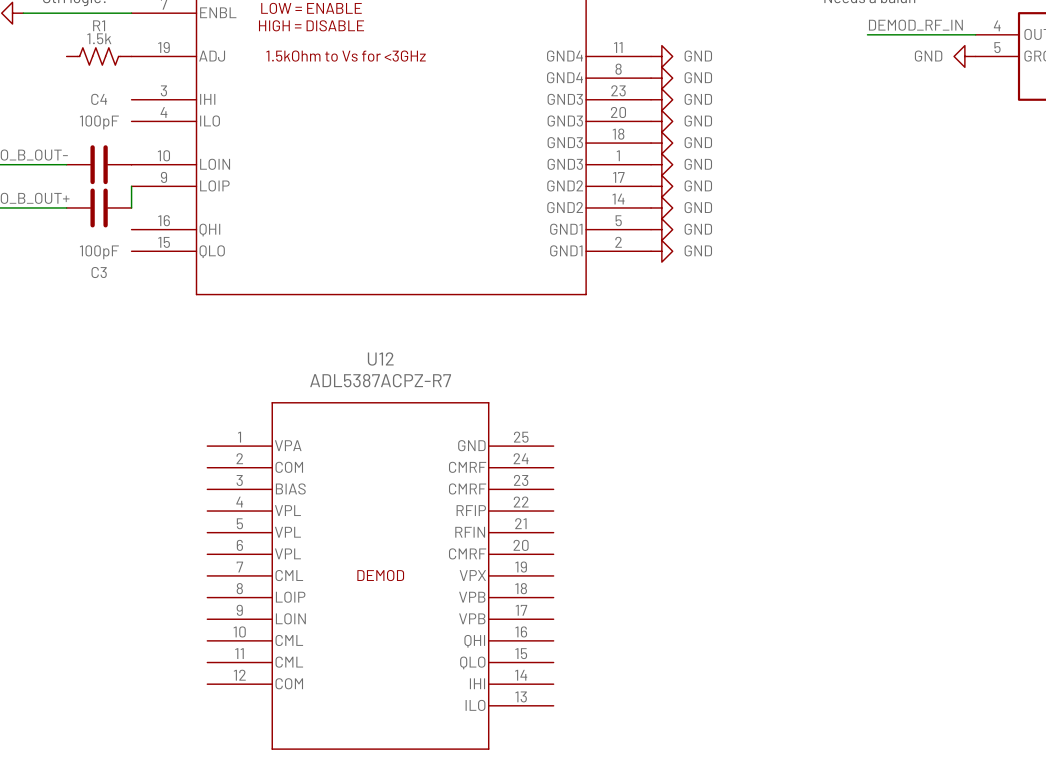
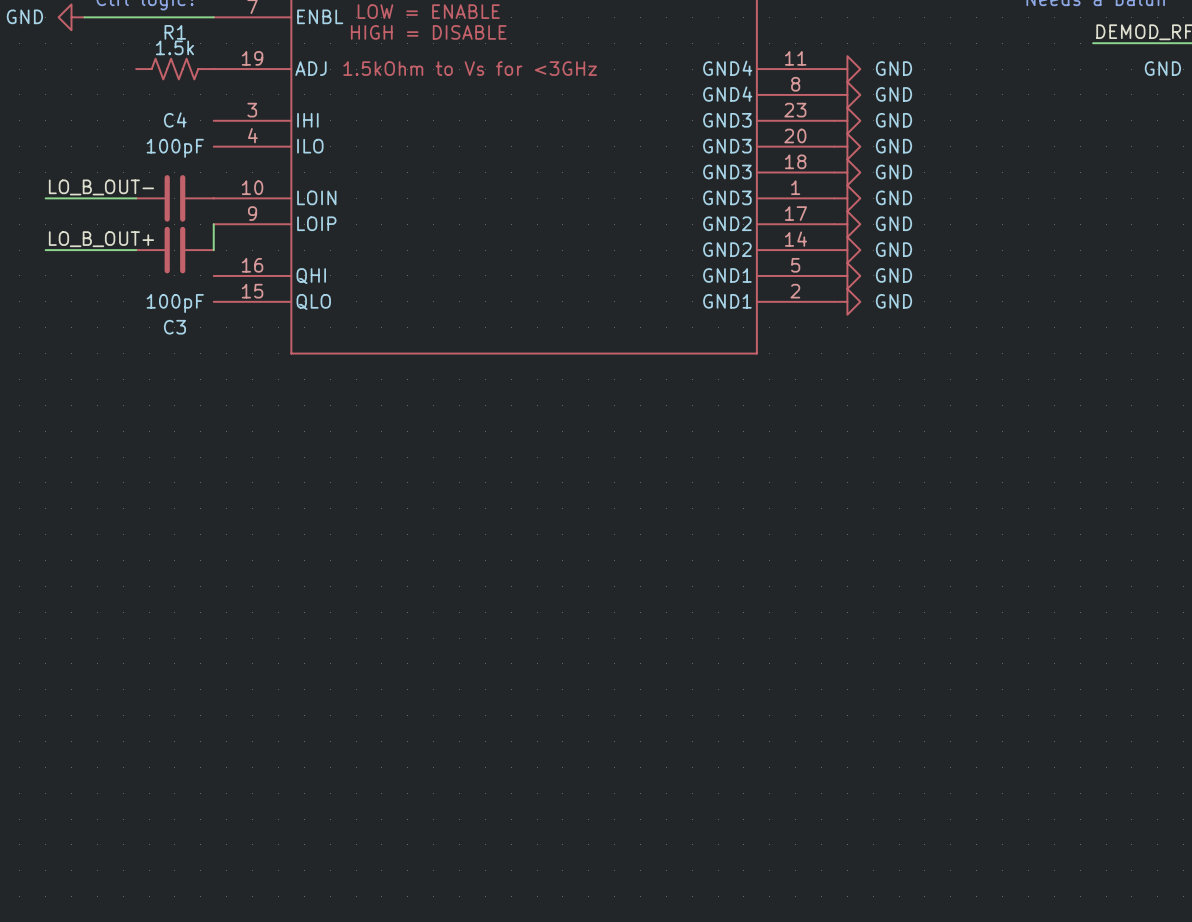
U12: ADL5387ACPZ-R7 (380, 575) -> none

